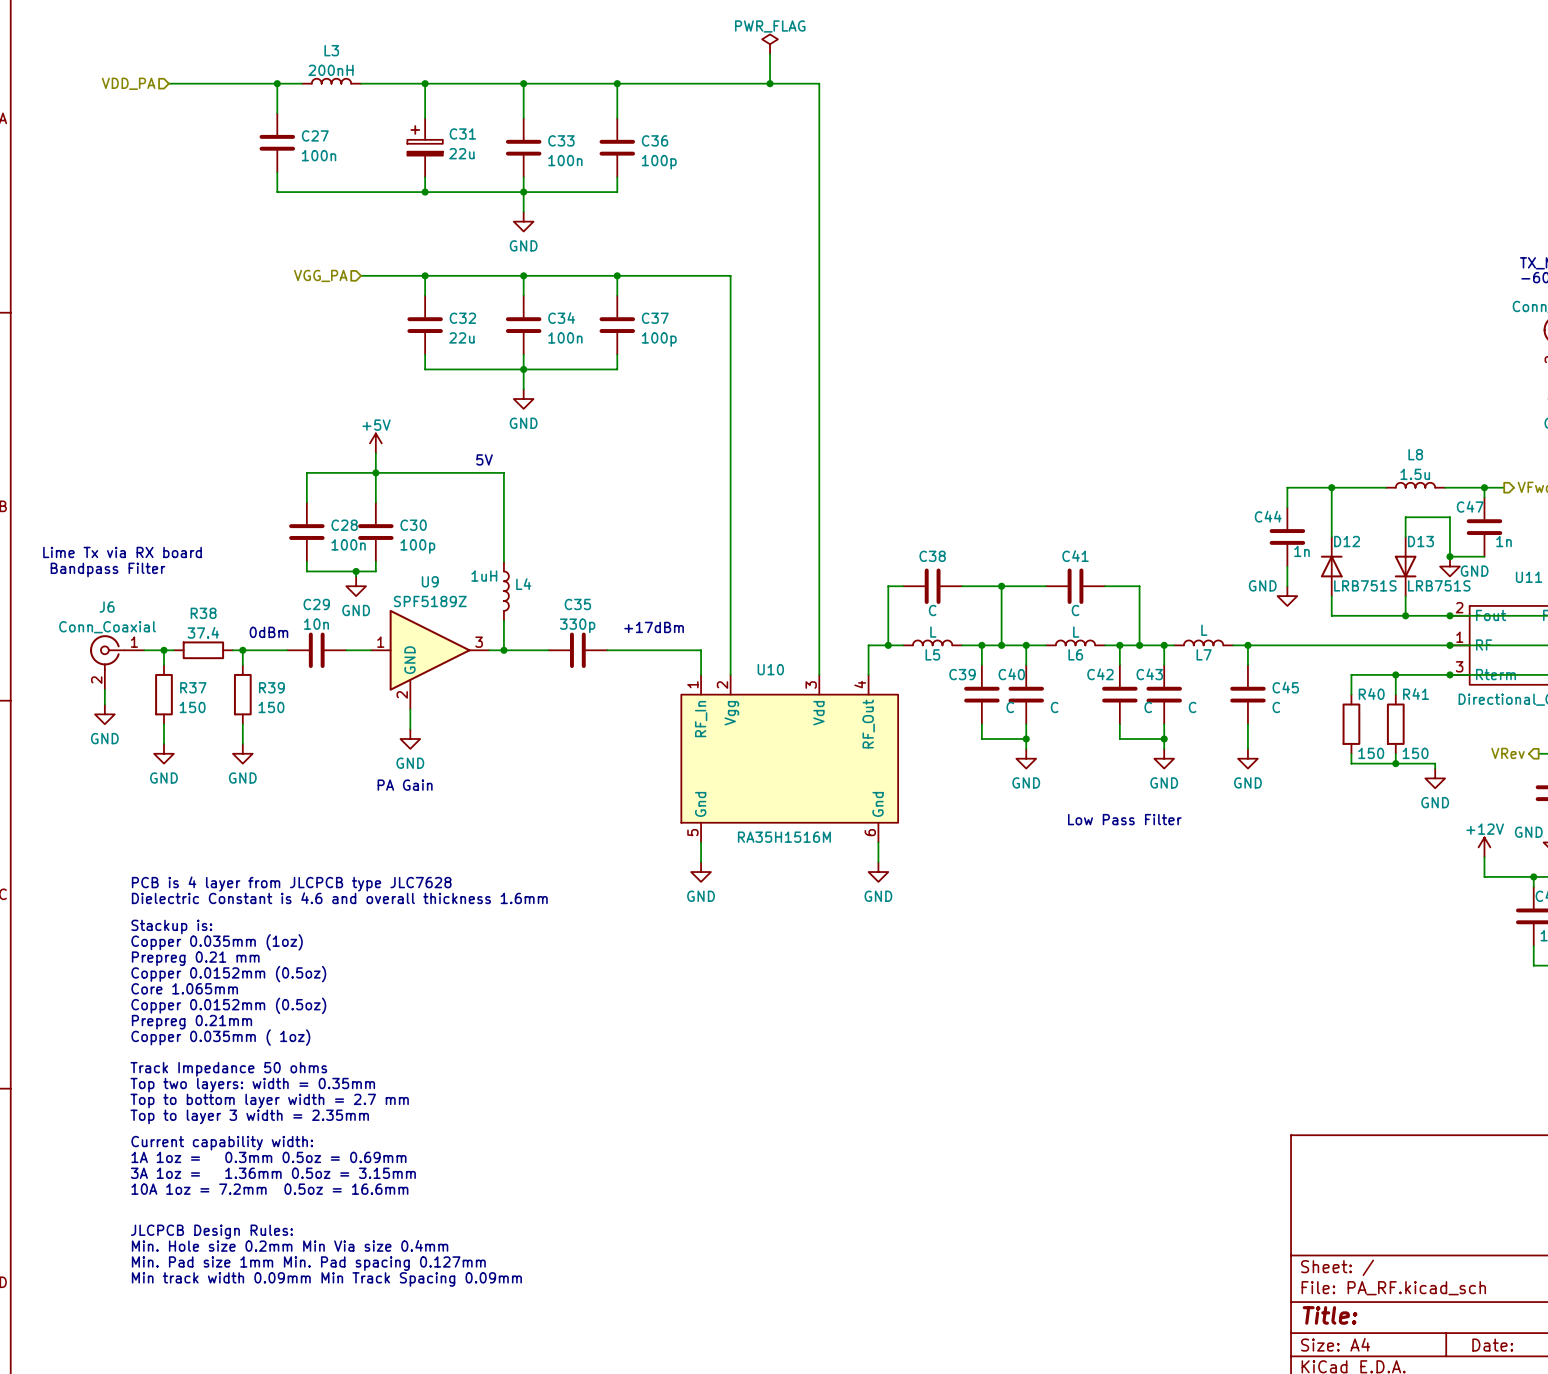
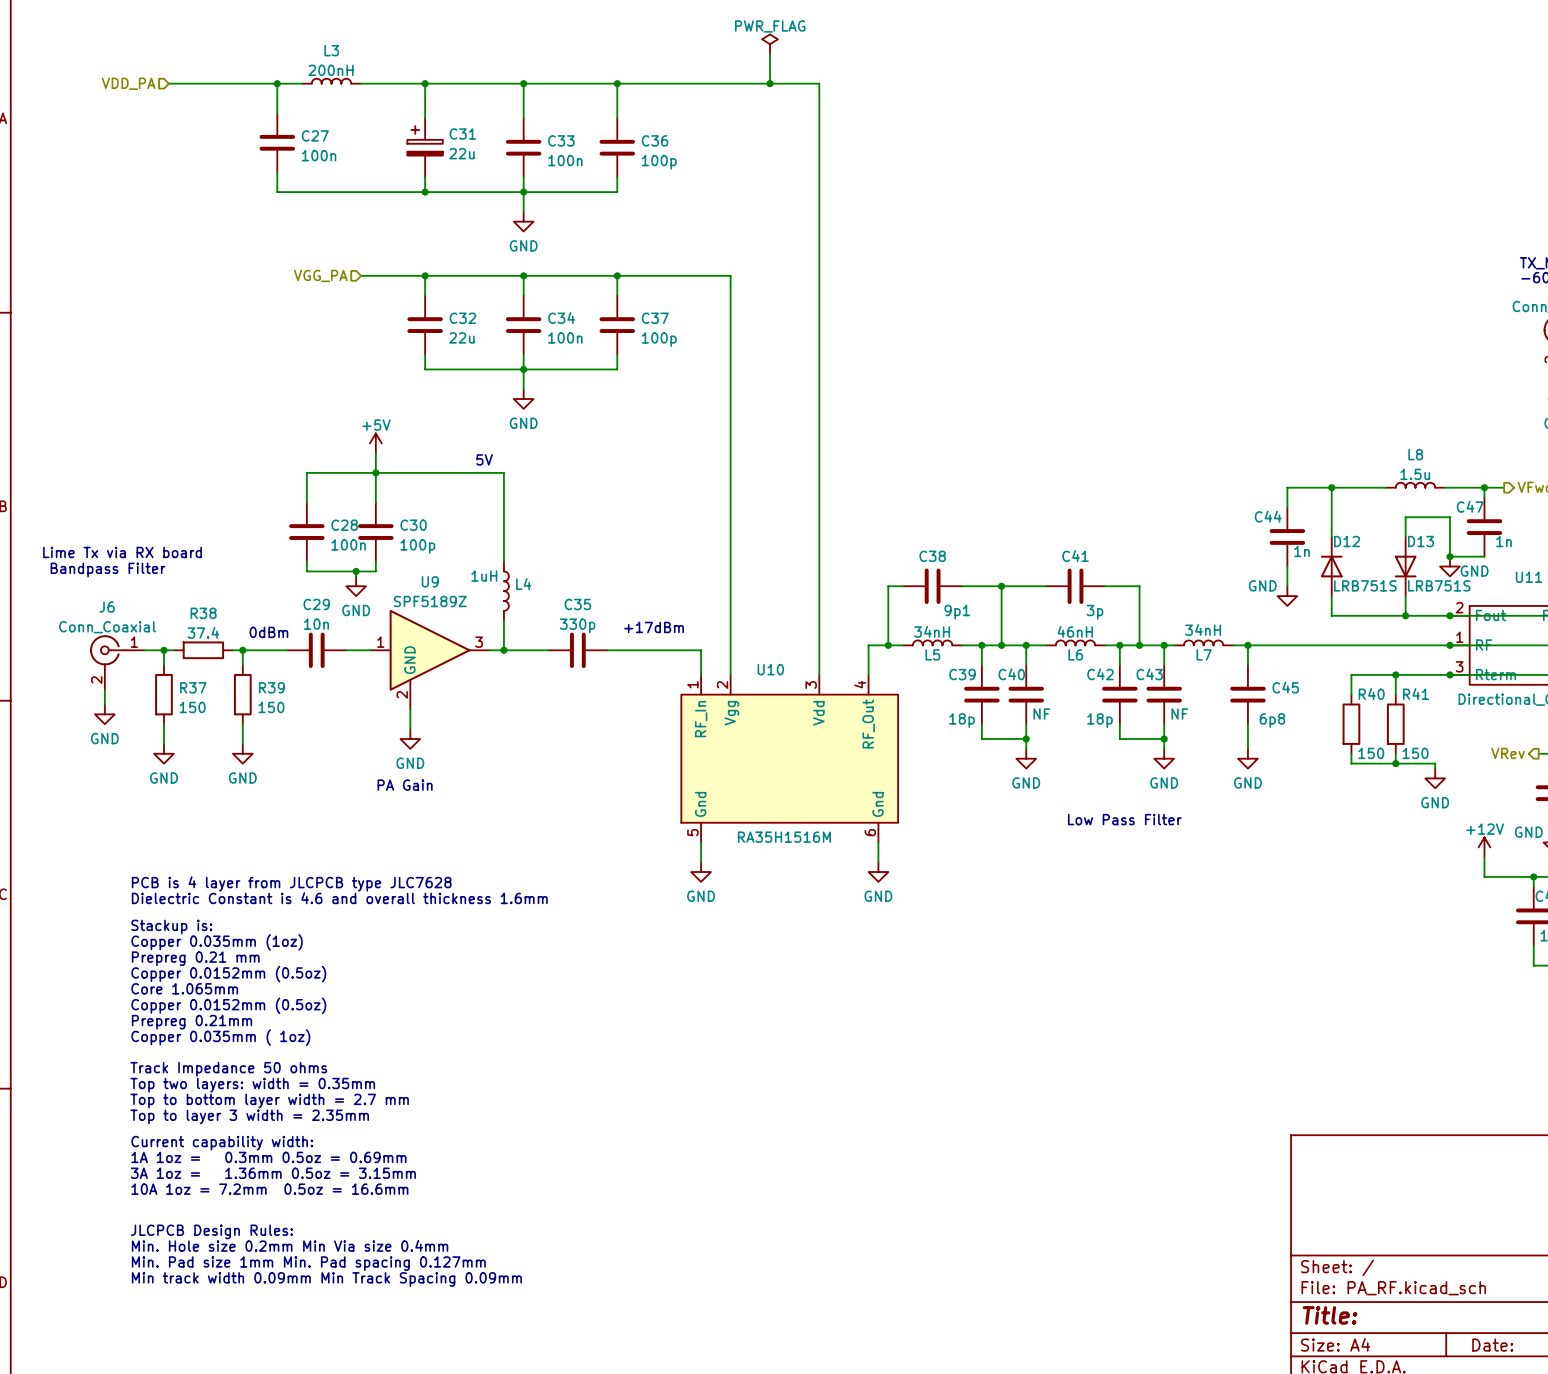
C38 value: C (932, 610) -> 9p1 (957, 612)
C41 value: C (1075, 610) -> 3p (1094, 612)
L7 value: L (1204, 630) -> 34nH (1203, 629)
L5 value: L (933, 632) -> 34nH (932, 631)
L6 value: L (1076, 632) -> 46nH (1075, 631)
C39 value: C (1010, 707) -> 18p (962, 720)
C40 value: C (1054, 707) -> NF (1041, 713)
C42 value: C (1148, 707) -> 18p (1099, 720)
C43 value: C (1192, 707) -> NF (1179, 713)
C45 value: C (1276, 707) -> 6p8 (1272, 720)

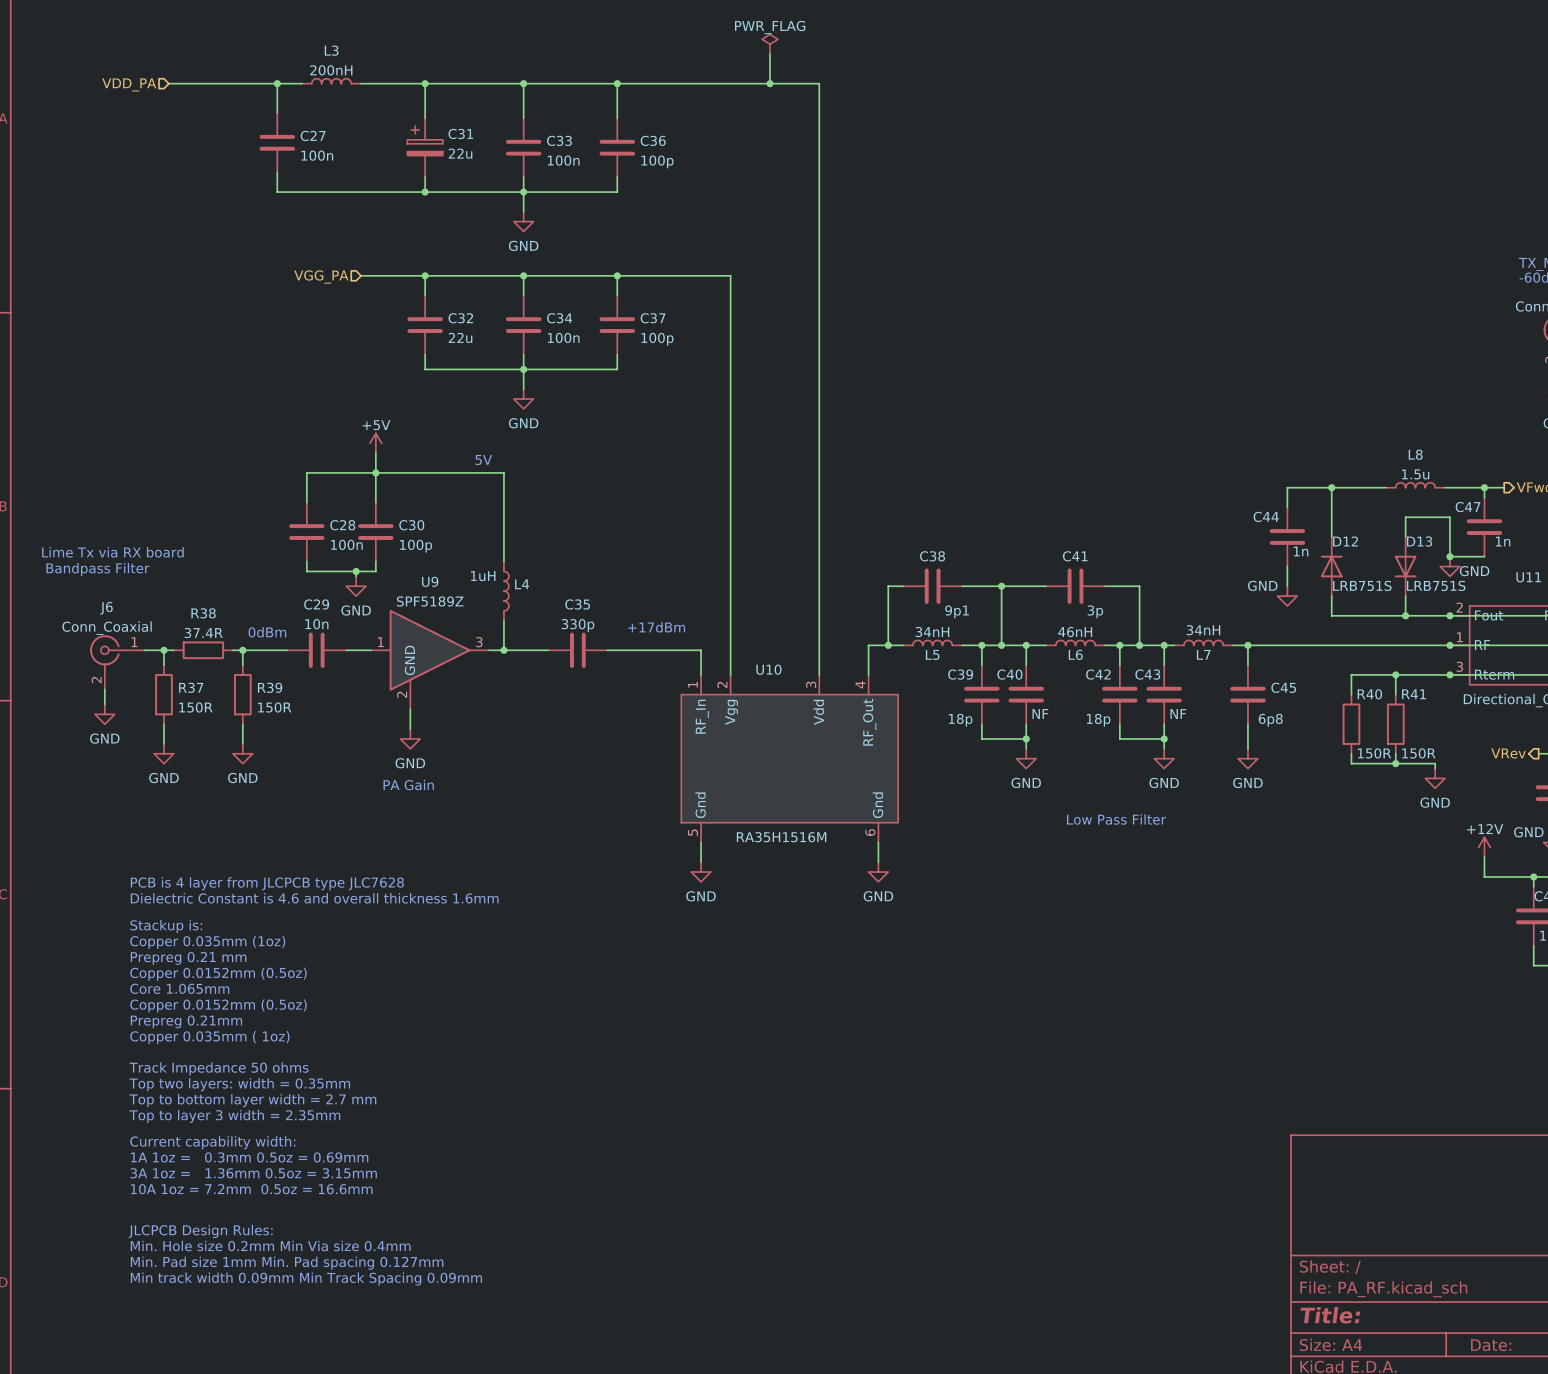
R38 value: 37.4 (203, 632) -> 37.4R (203, 633)
R37 value: 150 (192, 707) -> 150R (195, 707)
R39 value: 150 (271, 707) -> 150R (274, 707)
R40 value: 150 (1371, 753) -> 150R (1374, 753)
R41 value: 150 (1415, 753) -> 150R (1418, 753)

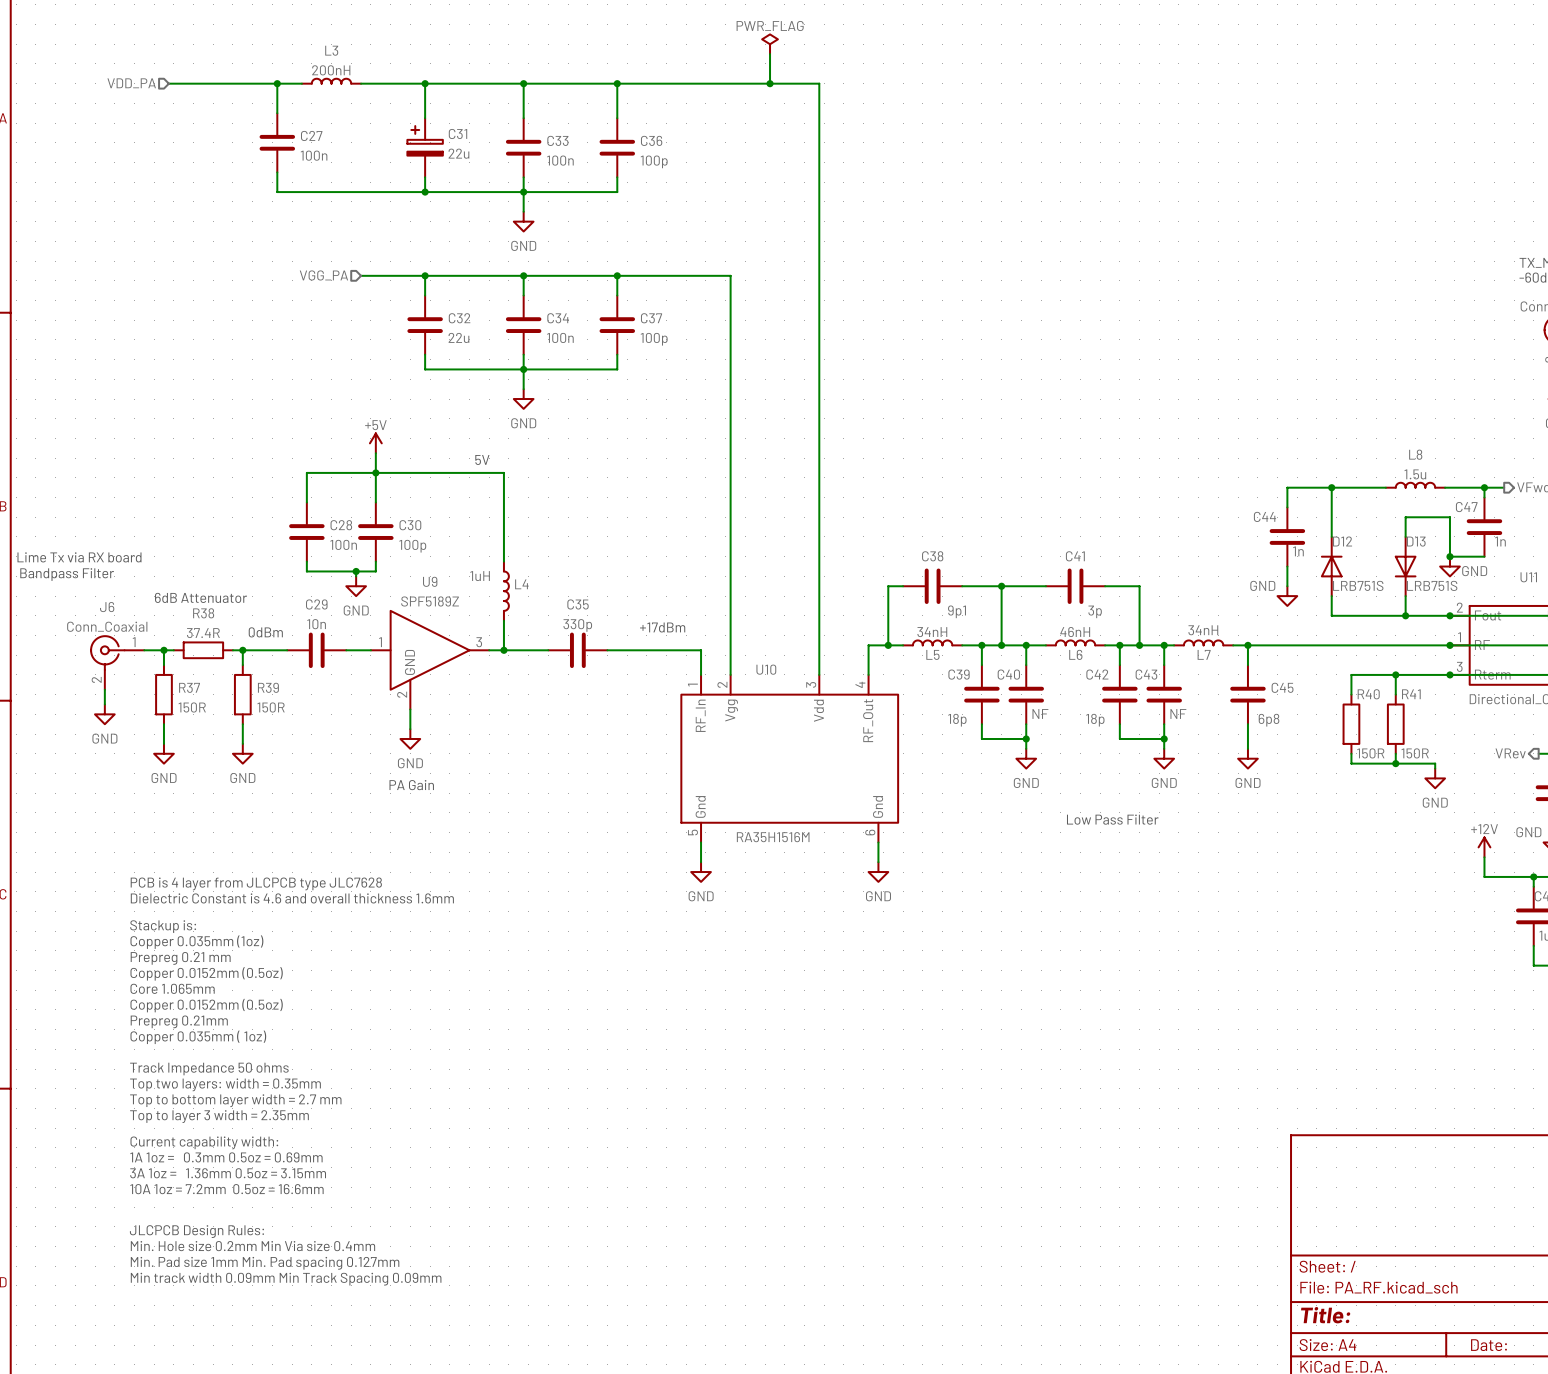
text position: Lime Tx via RX board (112, 552) -> Lime Tx via RX board (79, 557)
text position: Bandpass Filter (97, 569) -> Bandpass Filter (67, 574)
text: none -> 6dB Attenuator (201, 597)

